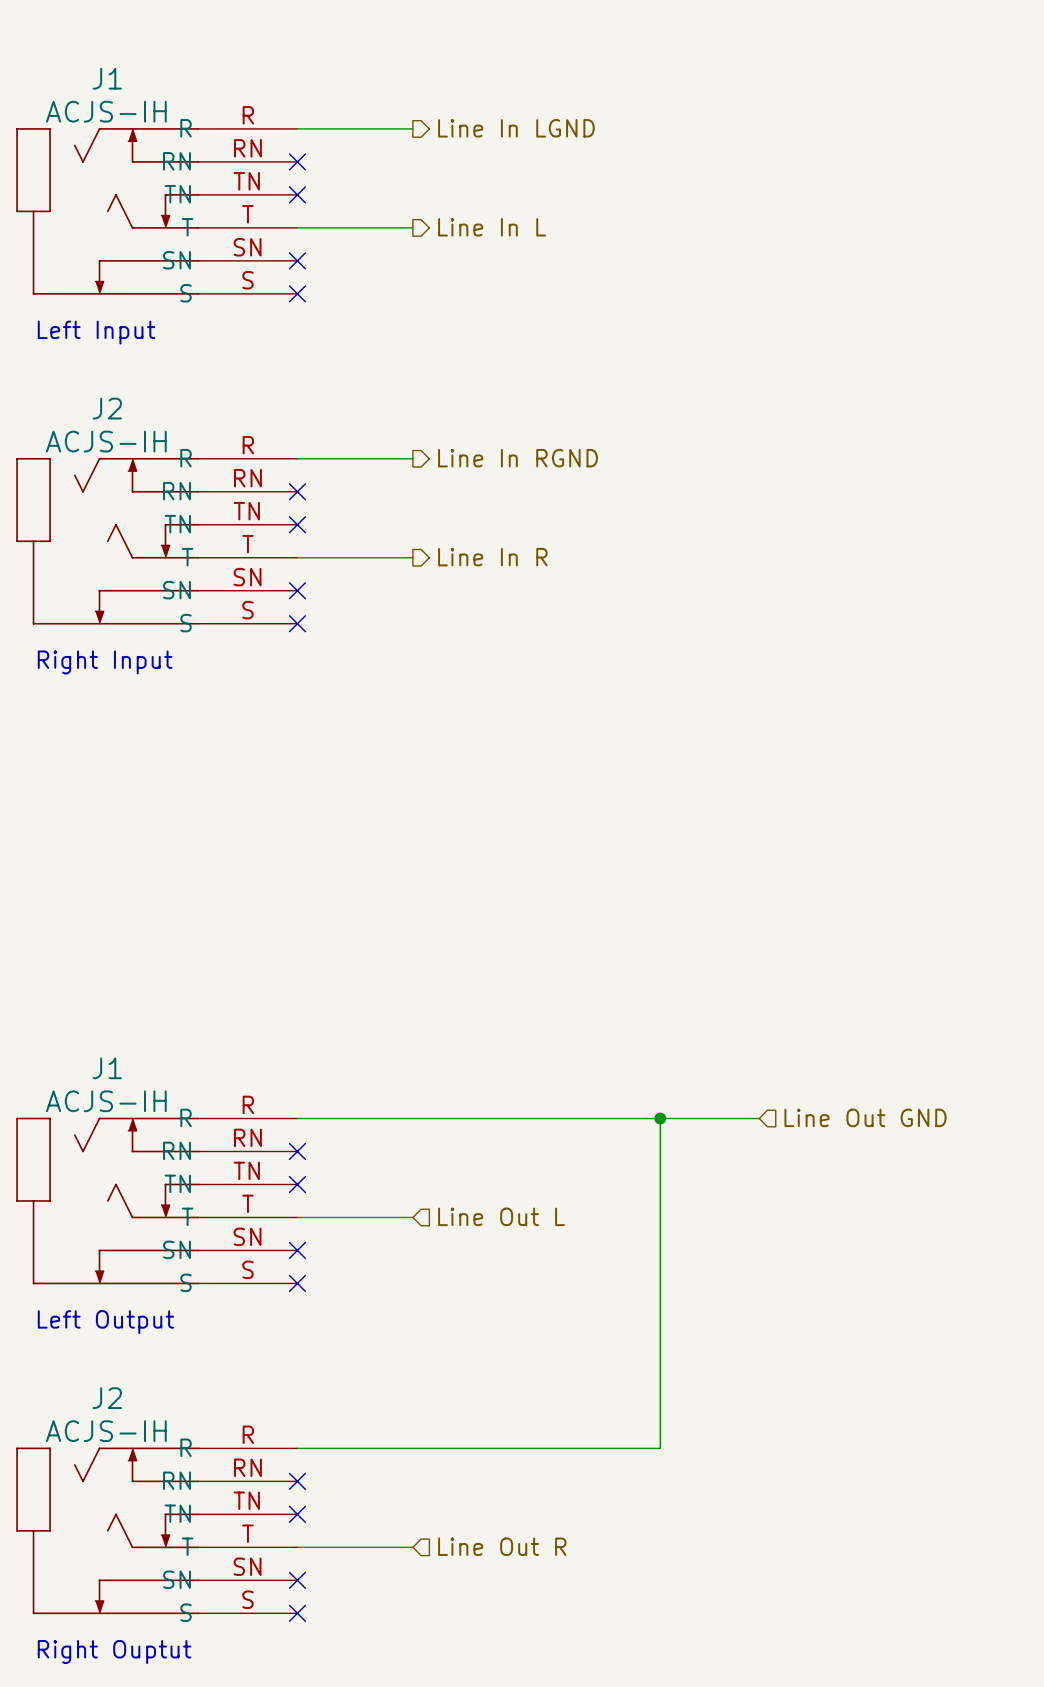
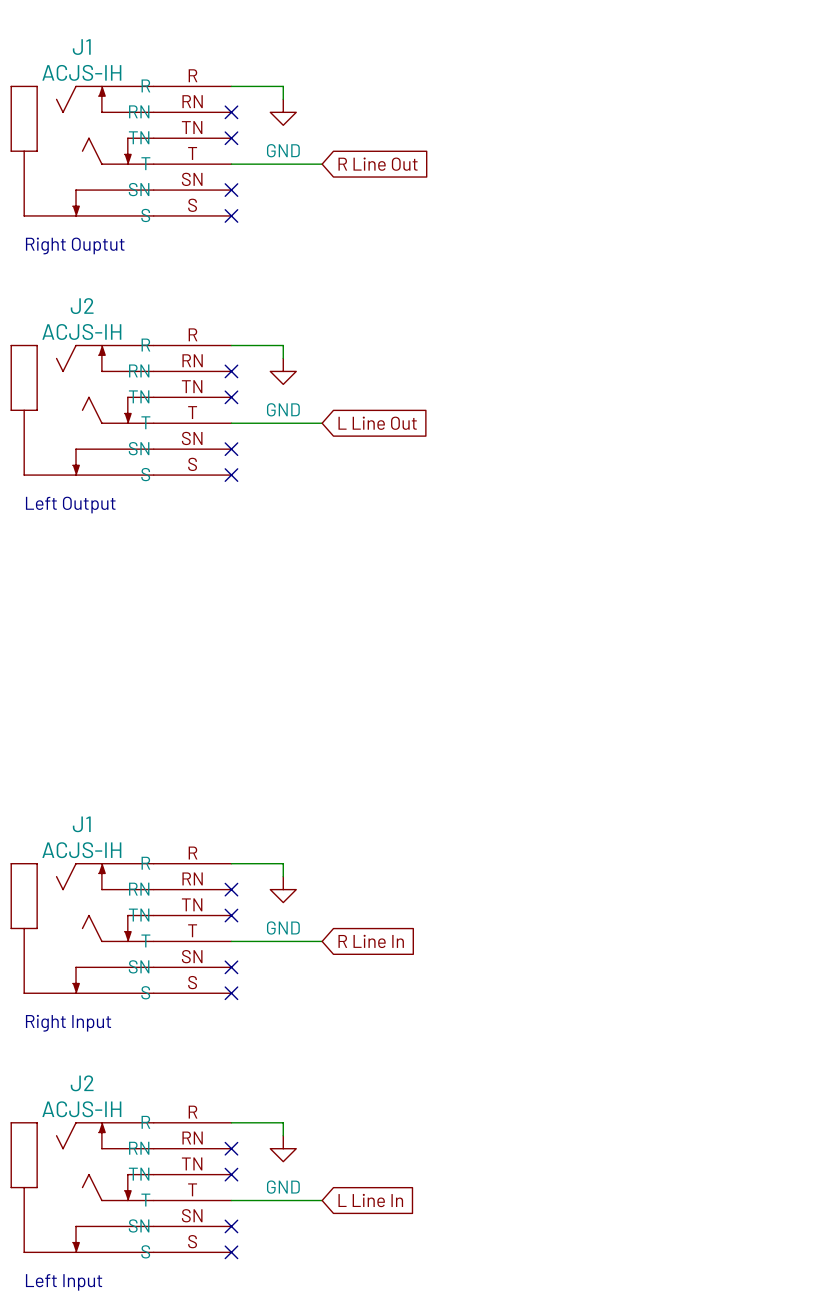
wire: (363, 128) (412, 128) -> (283, 86) (283, 99)
hierarchical label: Line In LGND (516, 128) -> none
power symbol: none -> GND (283, 112)
hierarchical label: Line In L (492, 227) -> none
global label: none -> R Line Out (378, 164)
text: Left Input (96, 332) -> Right Ouptut (75, 245)
wire: (363, 458) (412, 458) -> (283, 345) (283, 358)
hierarchical label: Line In RGND (517, 458) -> none
power symbol: none -> GND (283, 371)
hierarchical label: Line In R (492, 557) -> none
global label: none -> L Line Out (377, 423)
text: Right Input (105, 662) -> Left Output (70, 505)
hierarchical label: Line Out GND (865, 1117) -> none
wire: (363, 1118) (759, 1118) -> (283, 863) (283, 876)
wire: (660, 1118) (660, 1448) (363, 1448) -> (283, 1135) (283, 1122)
junction: (660, 1118) -> none
power symbol: none -> GND (283, 889)
hierarchical label: Line Out L (501, 1216) -> none
global label: none -> R Line In (371, 941)
text: Left Output (105, 1322) -> Right Input (68, 1023)
power symbol: none -> GND (283, 1148)
hierarchical label: Line Out R (502, 1546) -> none
global label: none -> L Line In (370, 1200)
text: Right Ouptut (114, 1652) -> Left Input (64, 1282)

